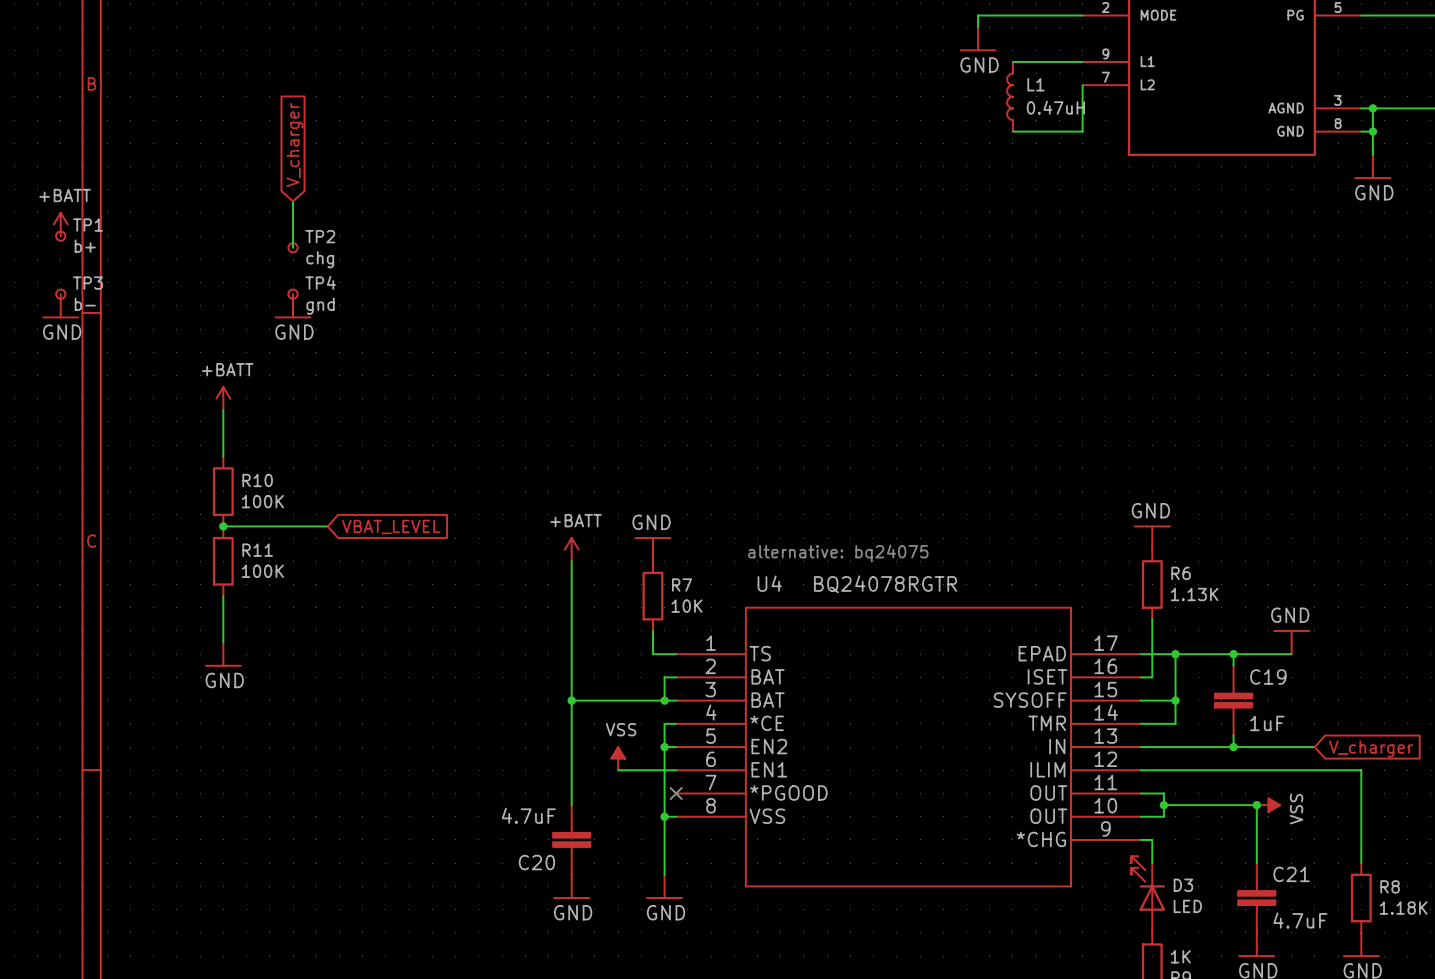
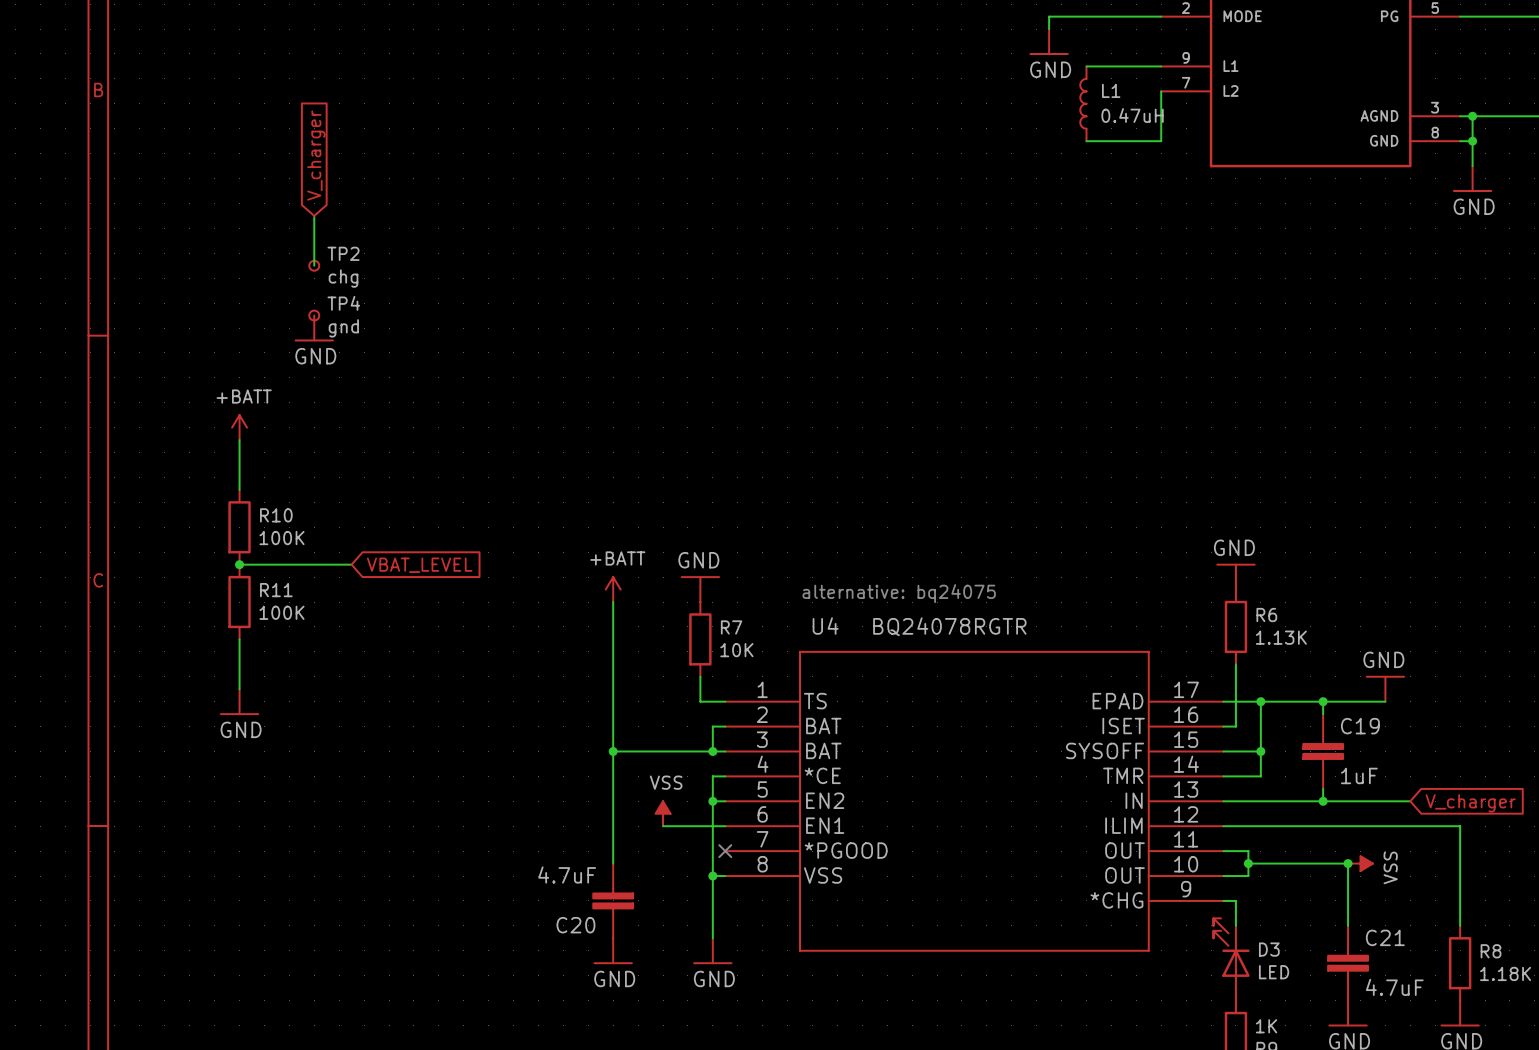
power symbol: +BATT (60, 224) -> none
TP1: b+ (60, 236) -> none
TP3: b- (60, 294) -> none
power symbol: GND (60, 305) -> none

